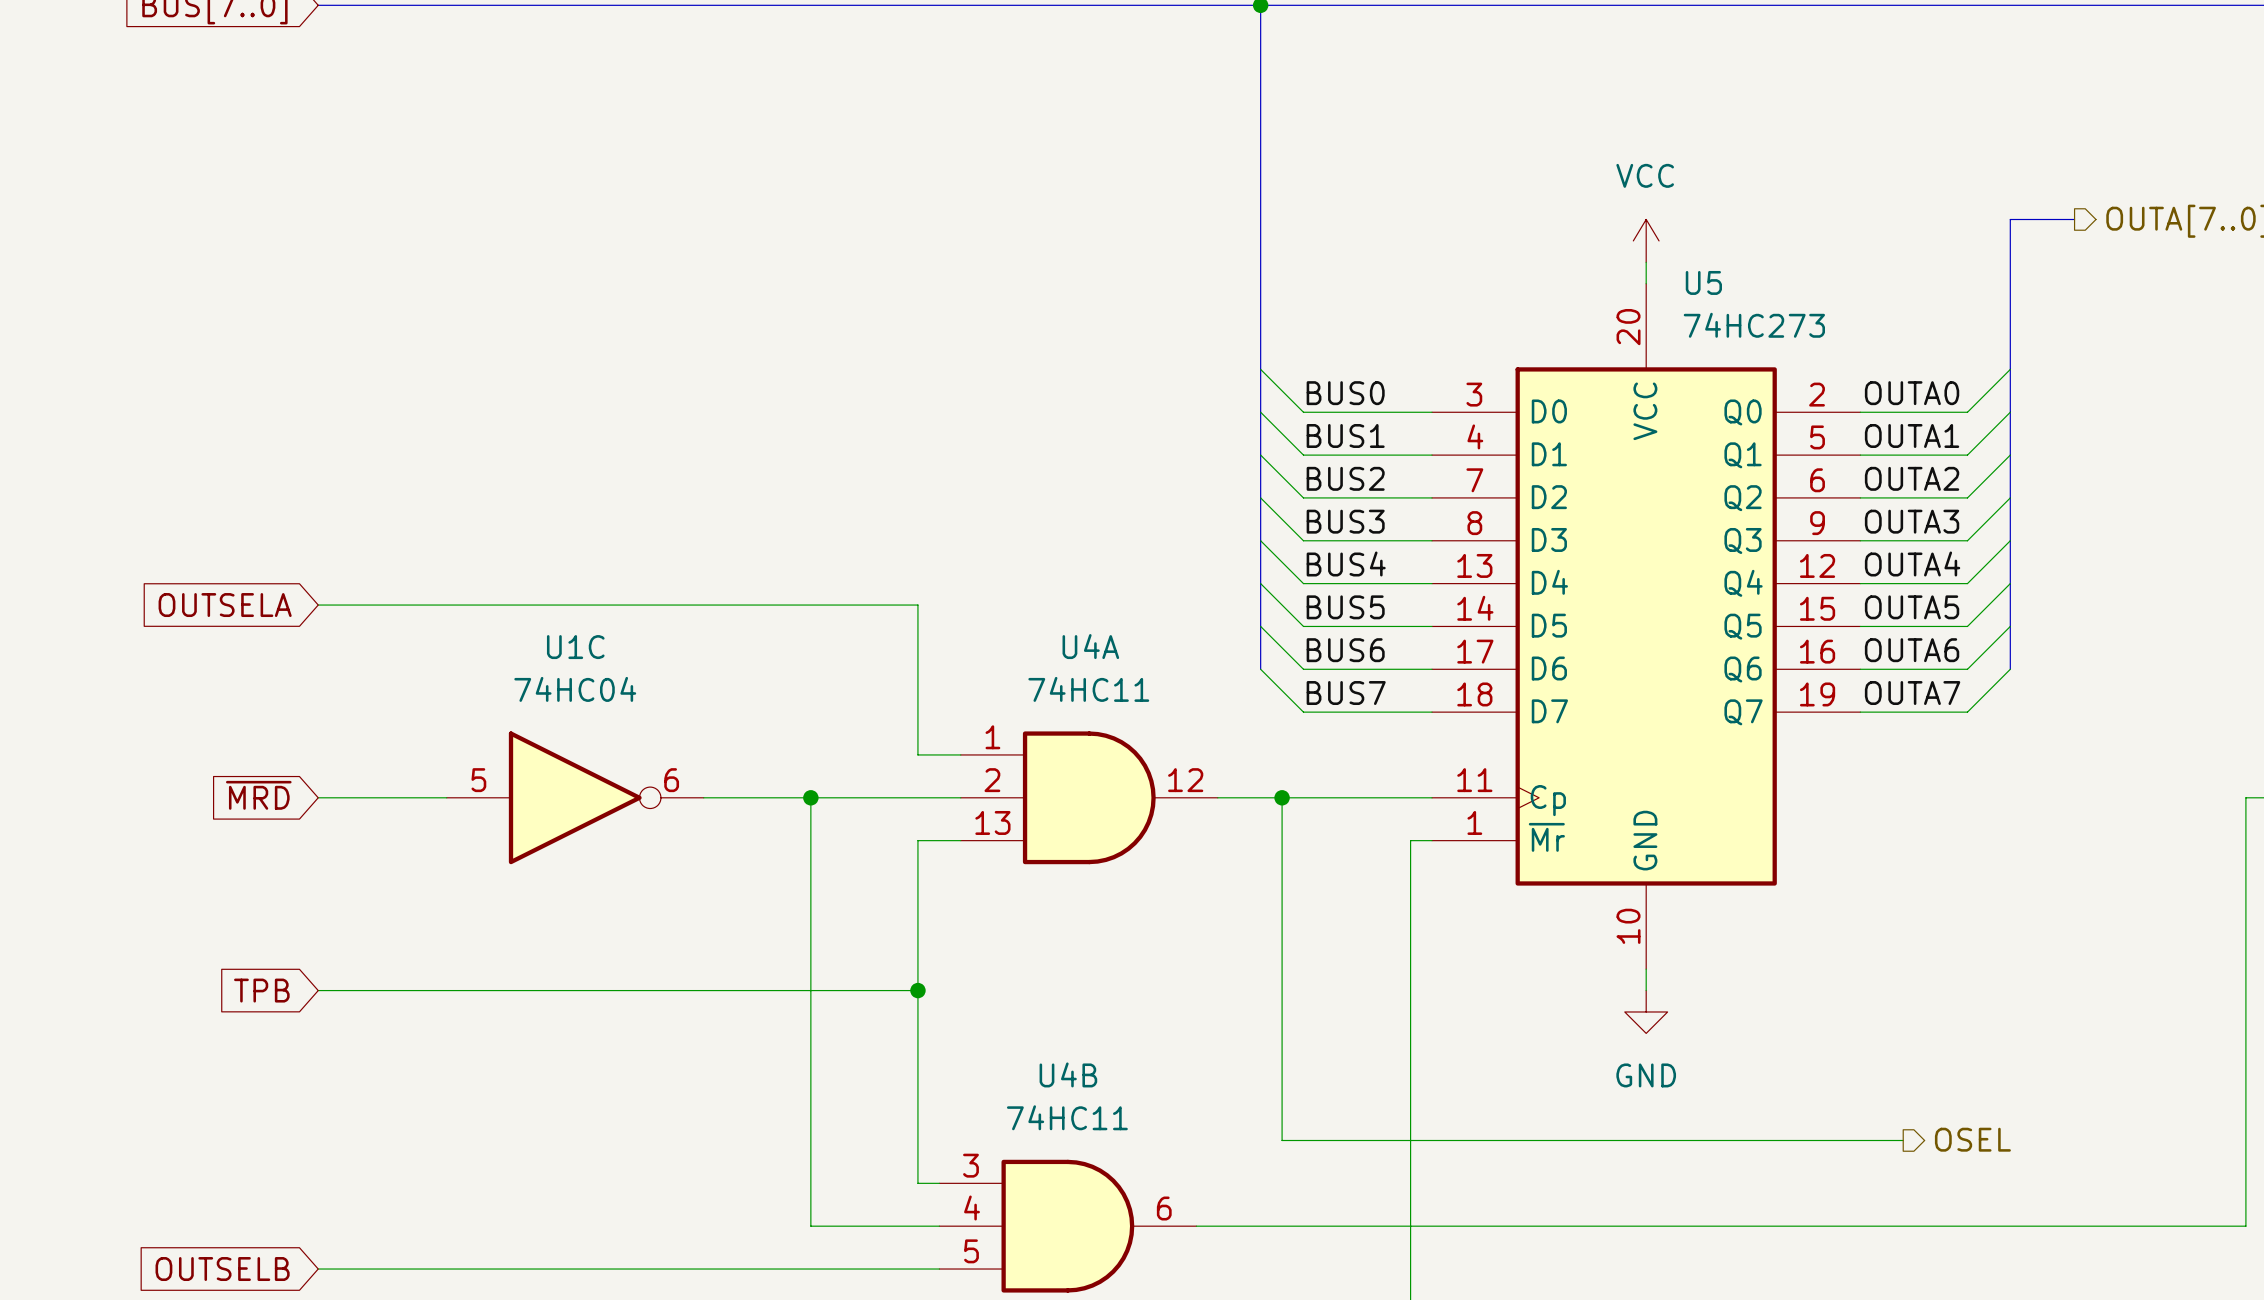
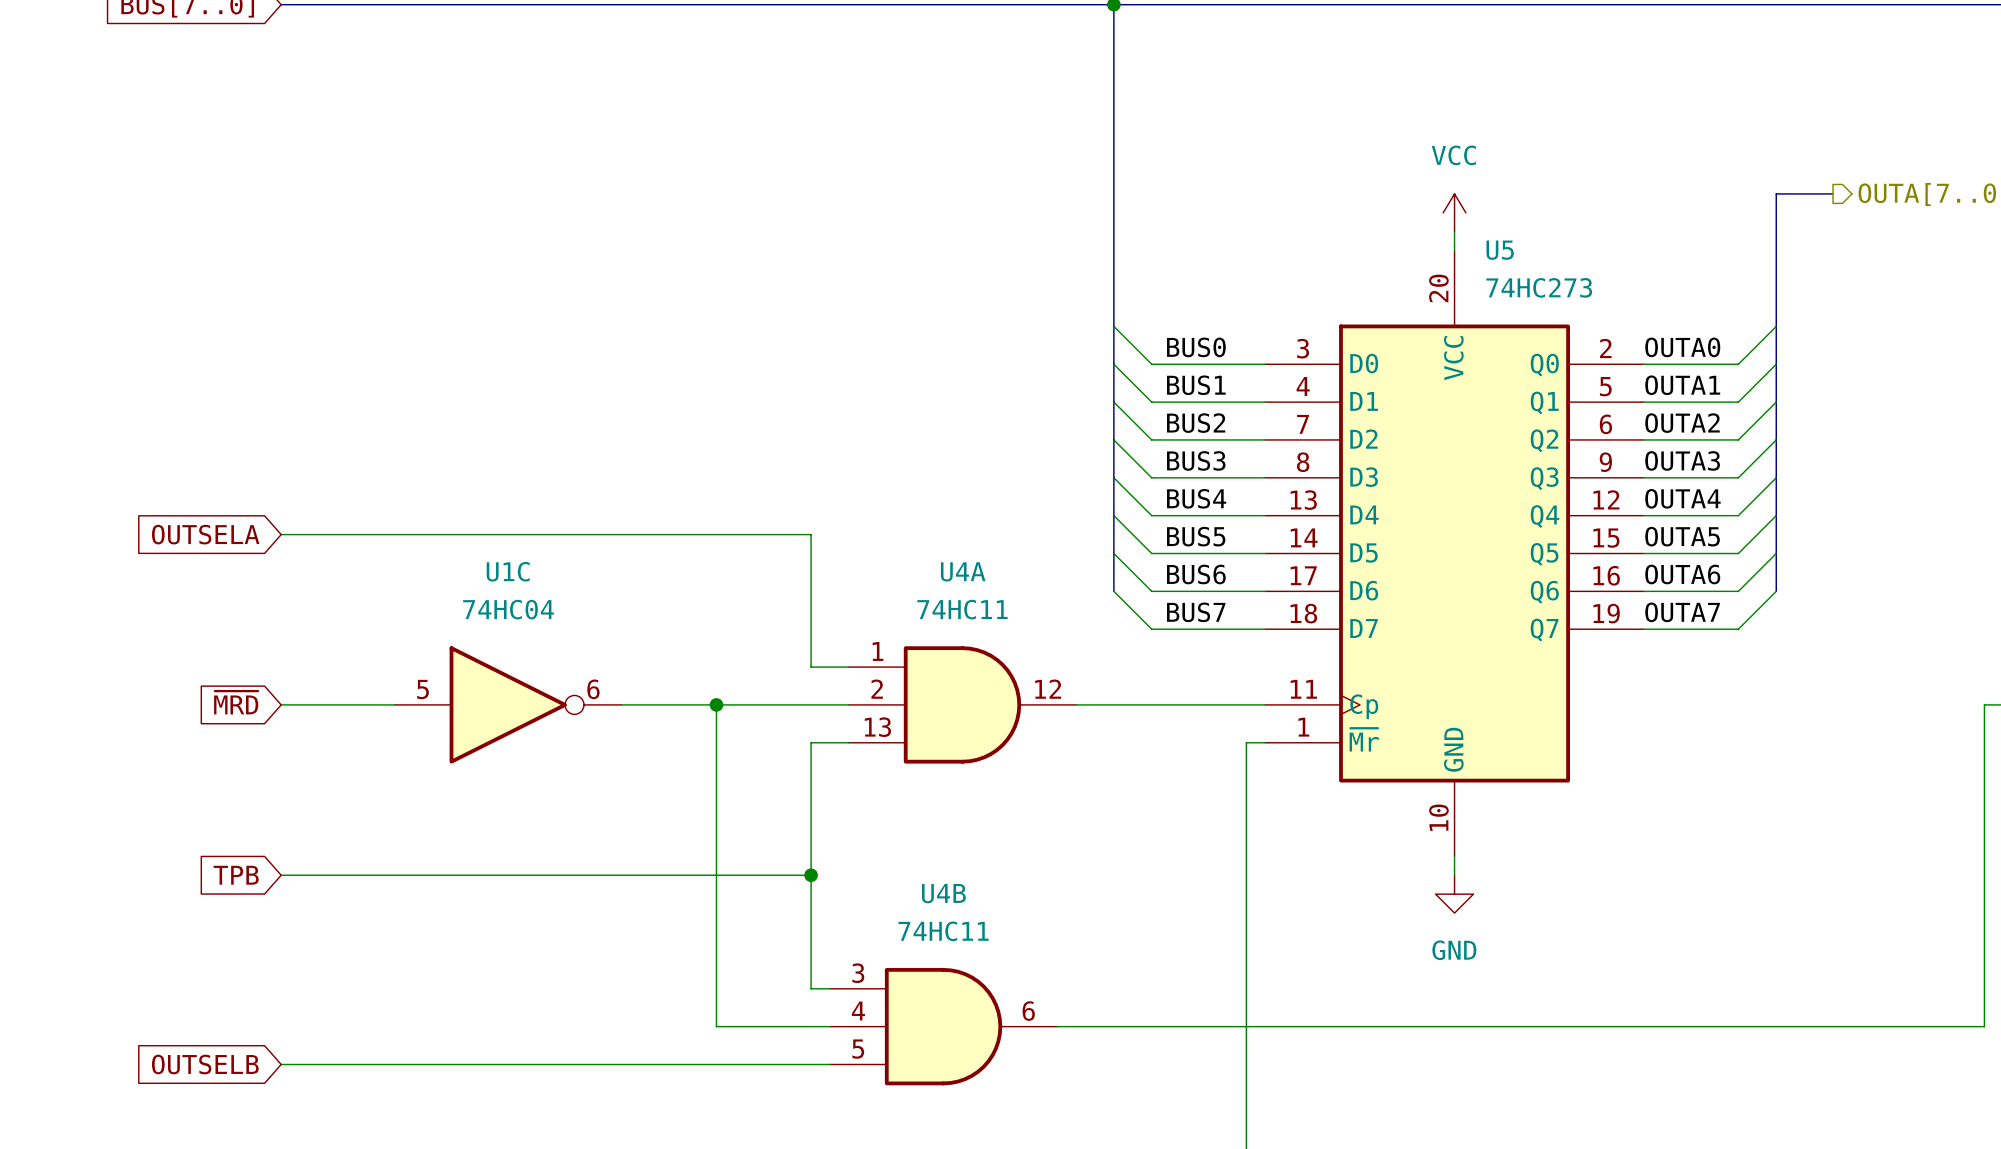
wire: (1282, 797) (1282, 1140) (1903, 1140) -> none
junction: (1282, 797) -> none
wire: (917, 1119) (917, 1183) (939, 1183) -> (811, 988) (830, 988)
hierarchical label: OSEL (1972, 1139) -> none
wire: (810, 1161) (810, 1226) (939, 1226) -> (716, 1026) (830, 1026)
wire: (2245, 1161) (2245, 1226) (1196, 1226) -> (1984, 1026) (1057, 1026)
U4B position: (1067, 1226) -> (943, 1026)
global label position: OUTSELB (222, 1269) -> OUTSELB (205, 1064)
wire: (318, 1269) (939, 1269) -> (281, 1064) (830, 1064)

